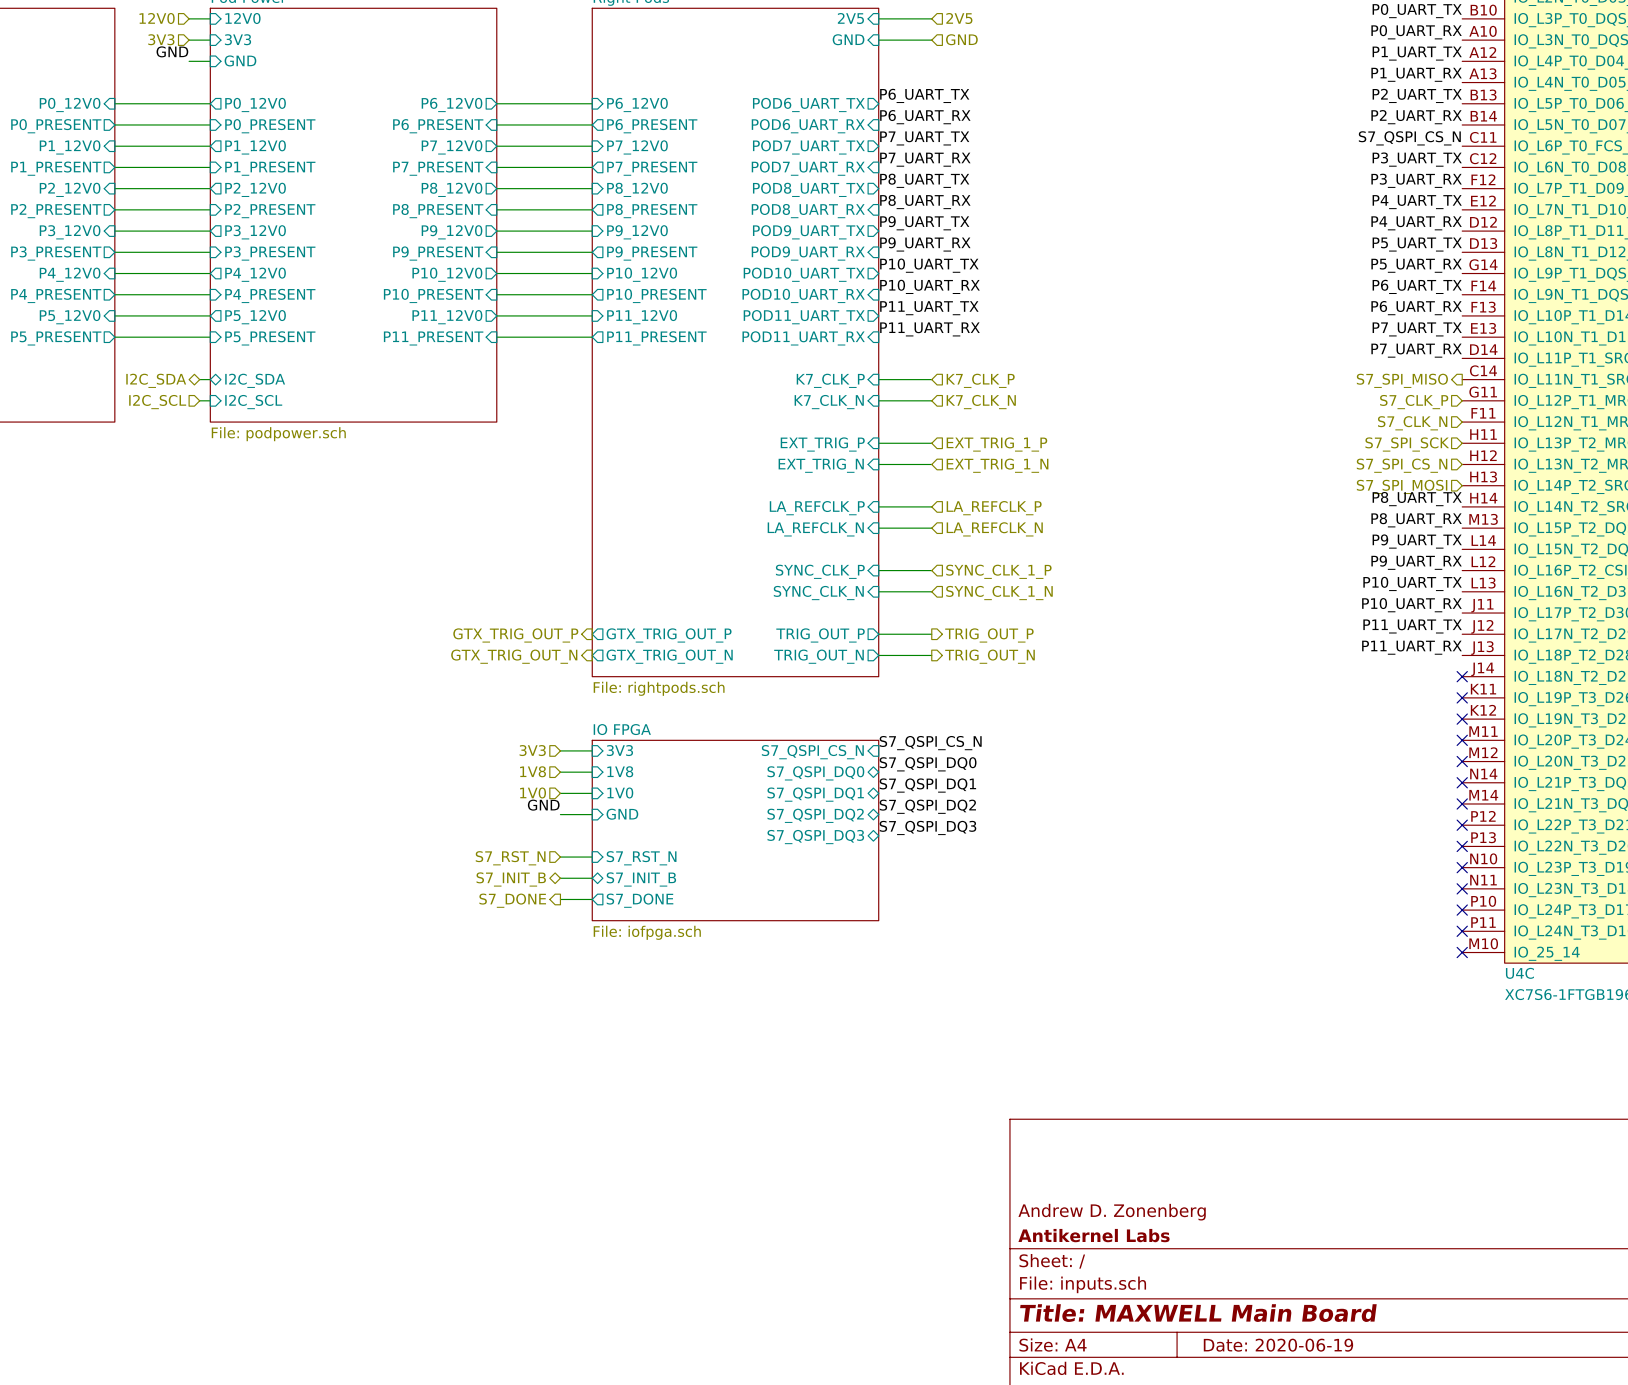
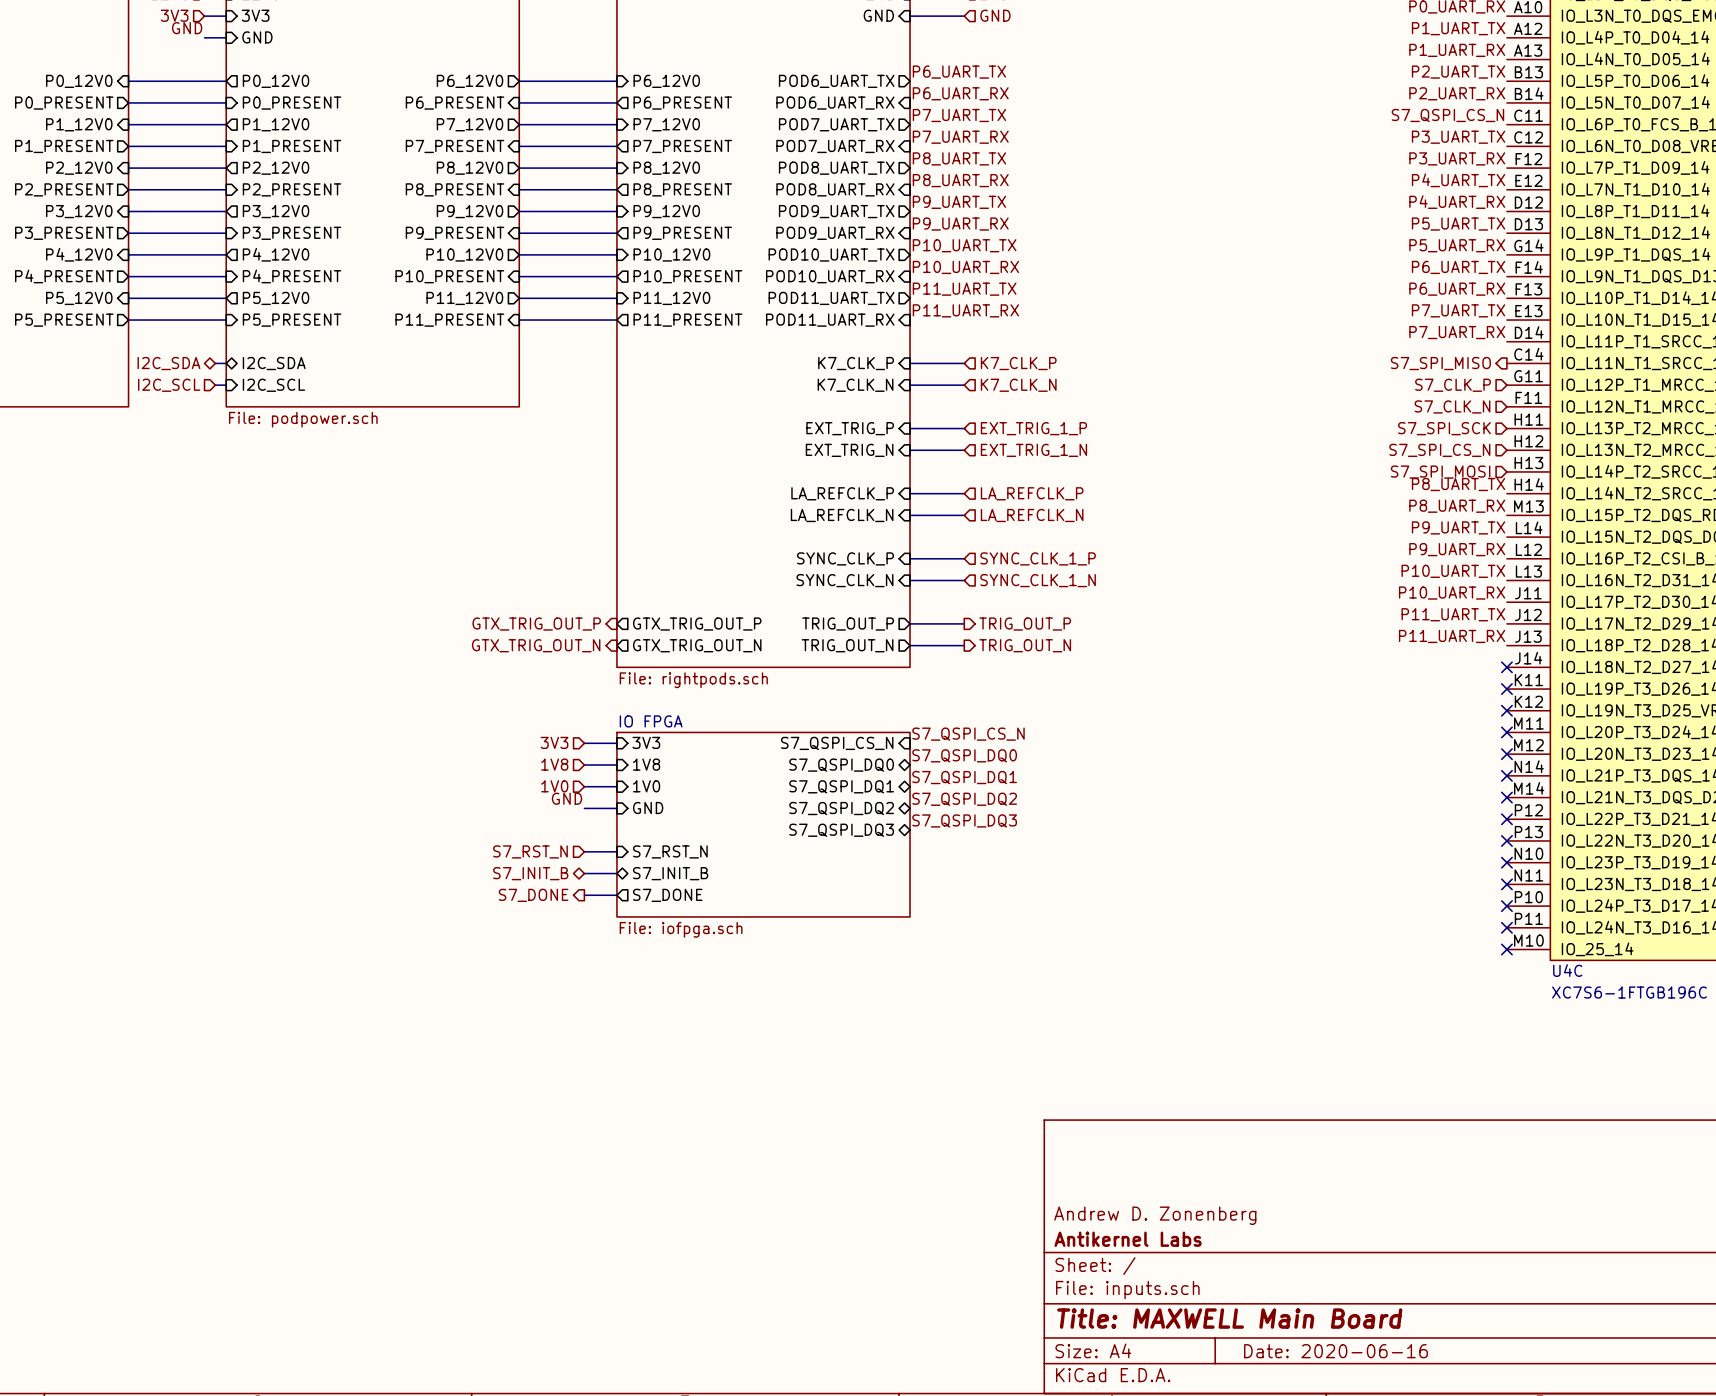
title block: Date: 2020-06-19 (1278, 1345) -> Date: 2020-06-16 (1336, 1351)

